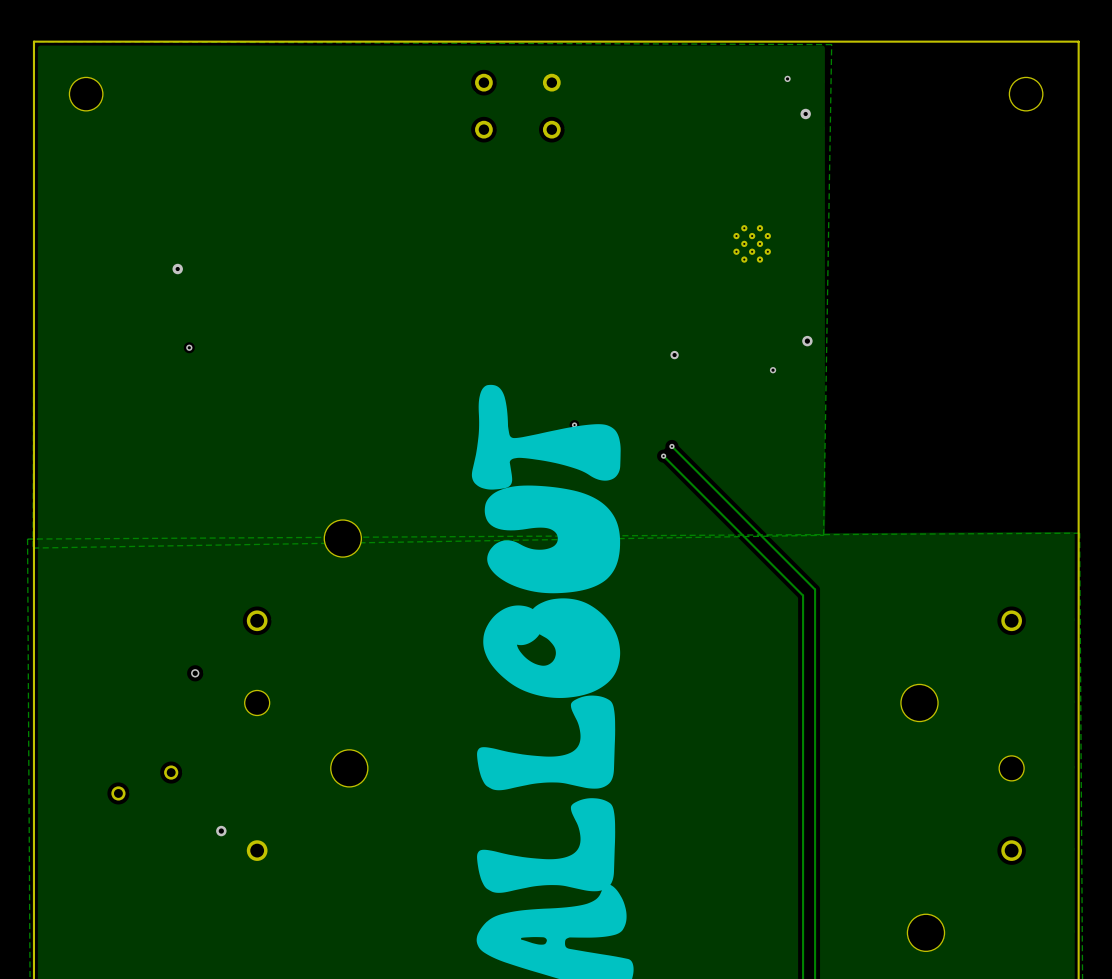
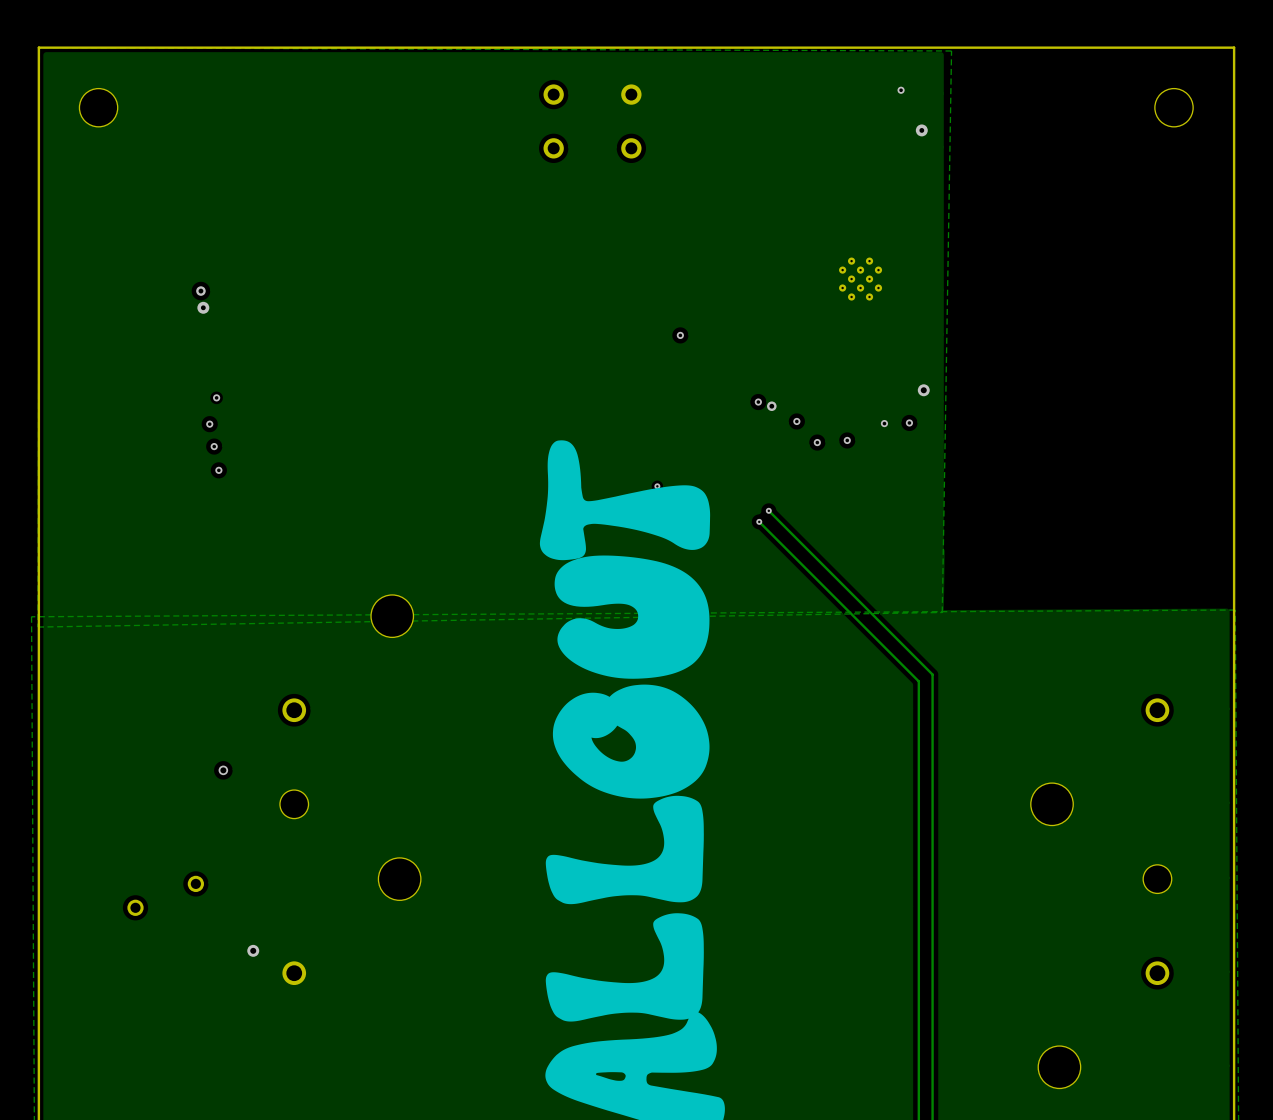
via: none -> (200, 291)
via: none -> (680, 335)
via: none -> (758, 402)
via: none -> (796, 421)
via: none -> (909, 422)
via: none -> (209, 424)
via: none -> (847, 440)
via: none -> (817, 442)
via: none -> (214, 446)
via: none -> (218, 470)

